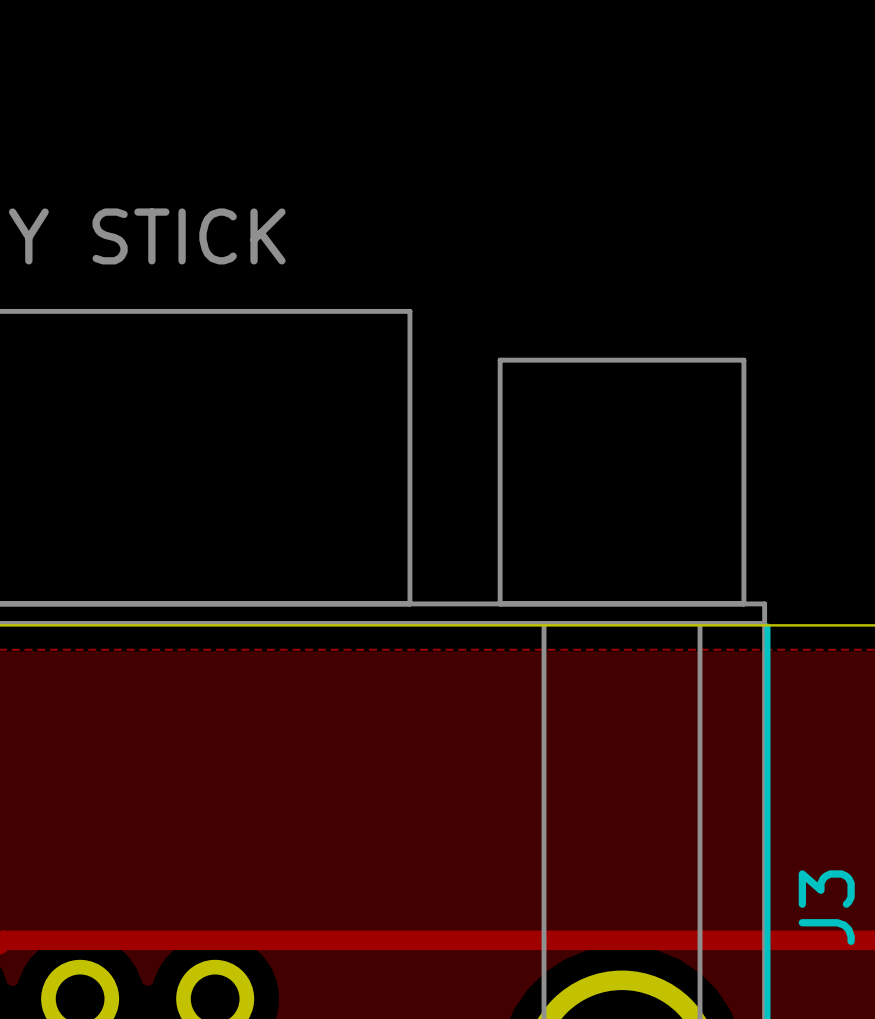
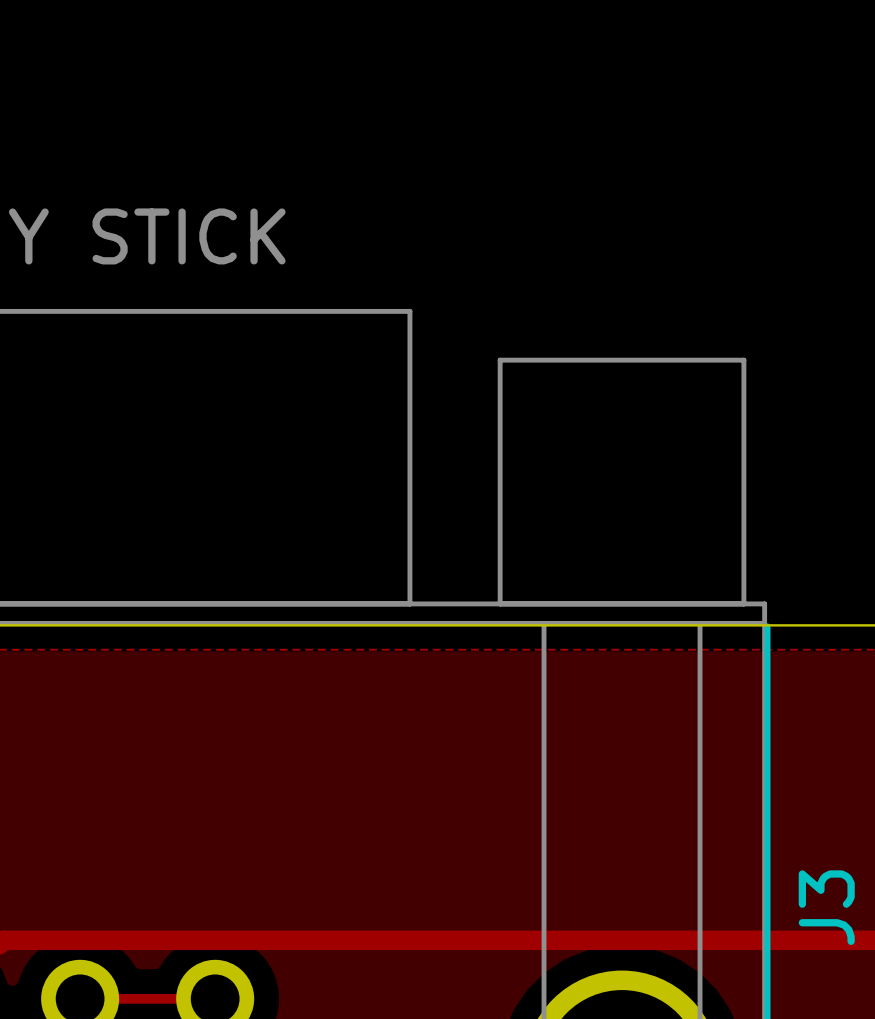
track: none -> (80, 998) (215, 998)

